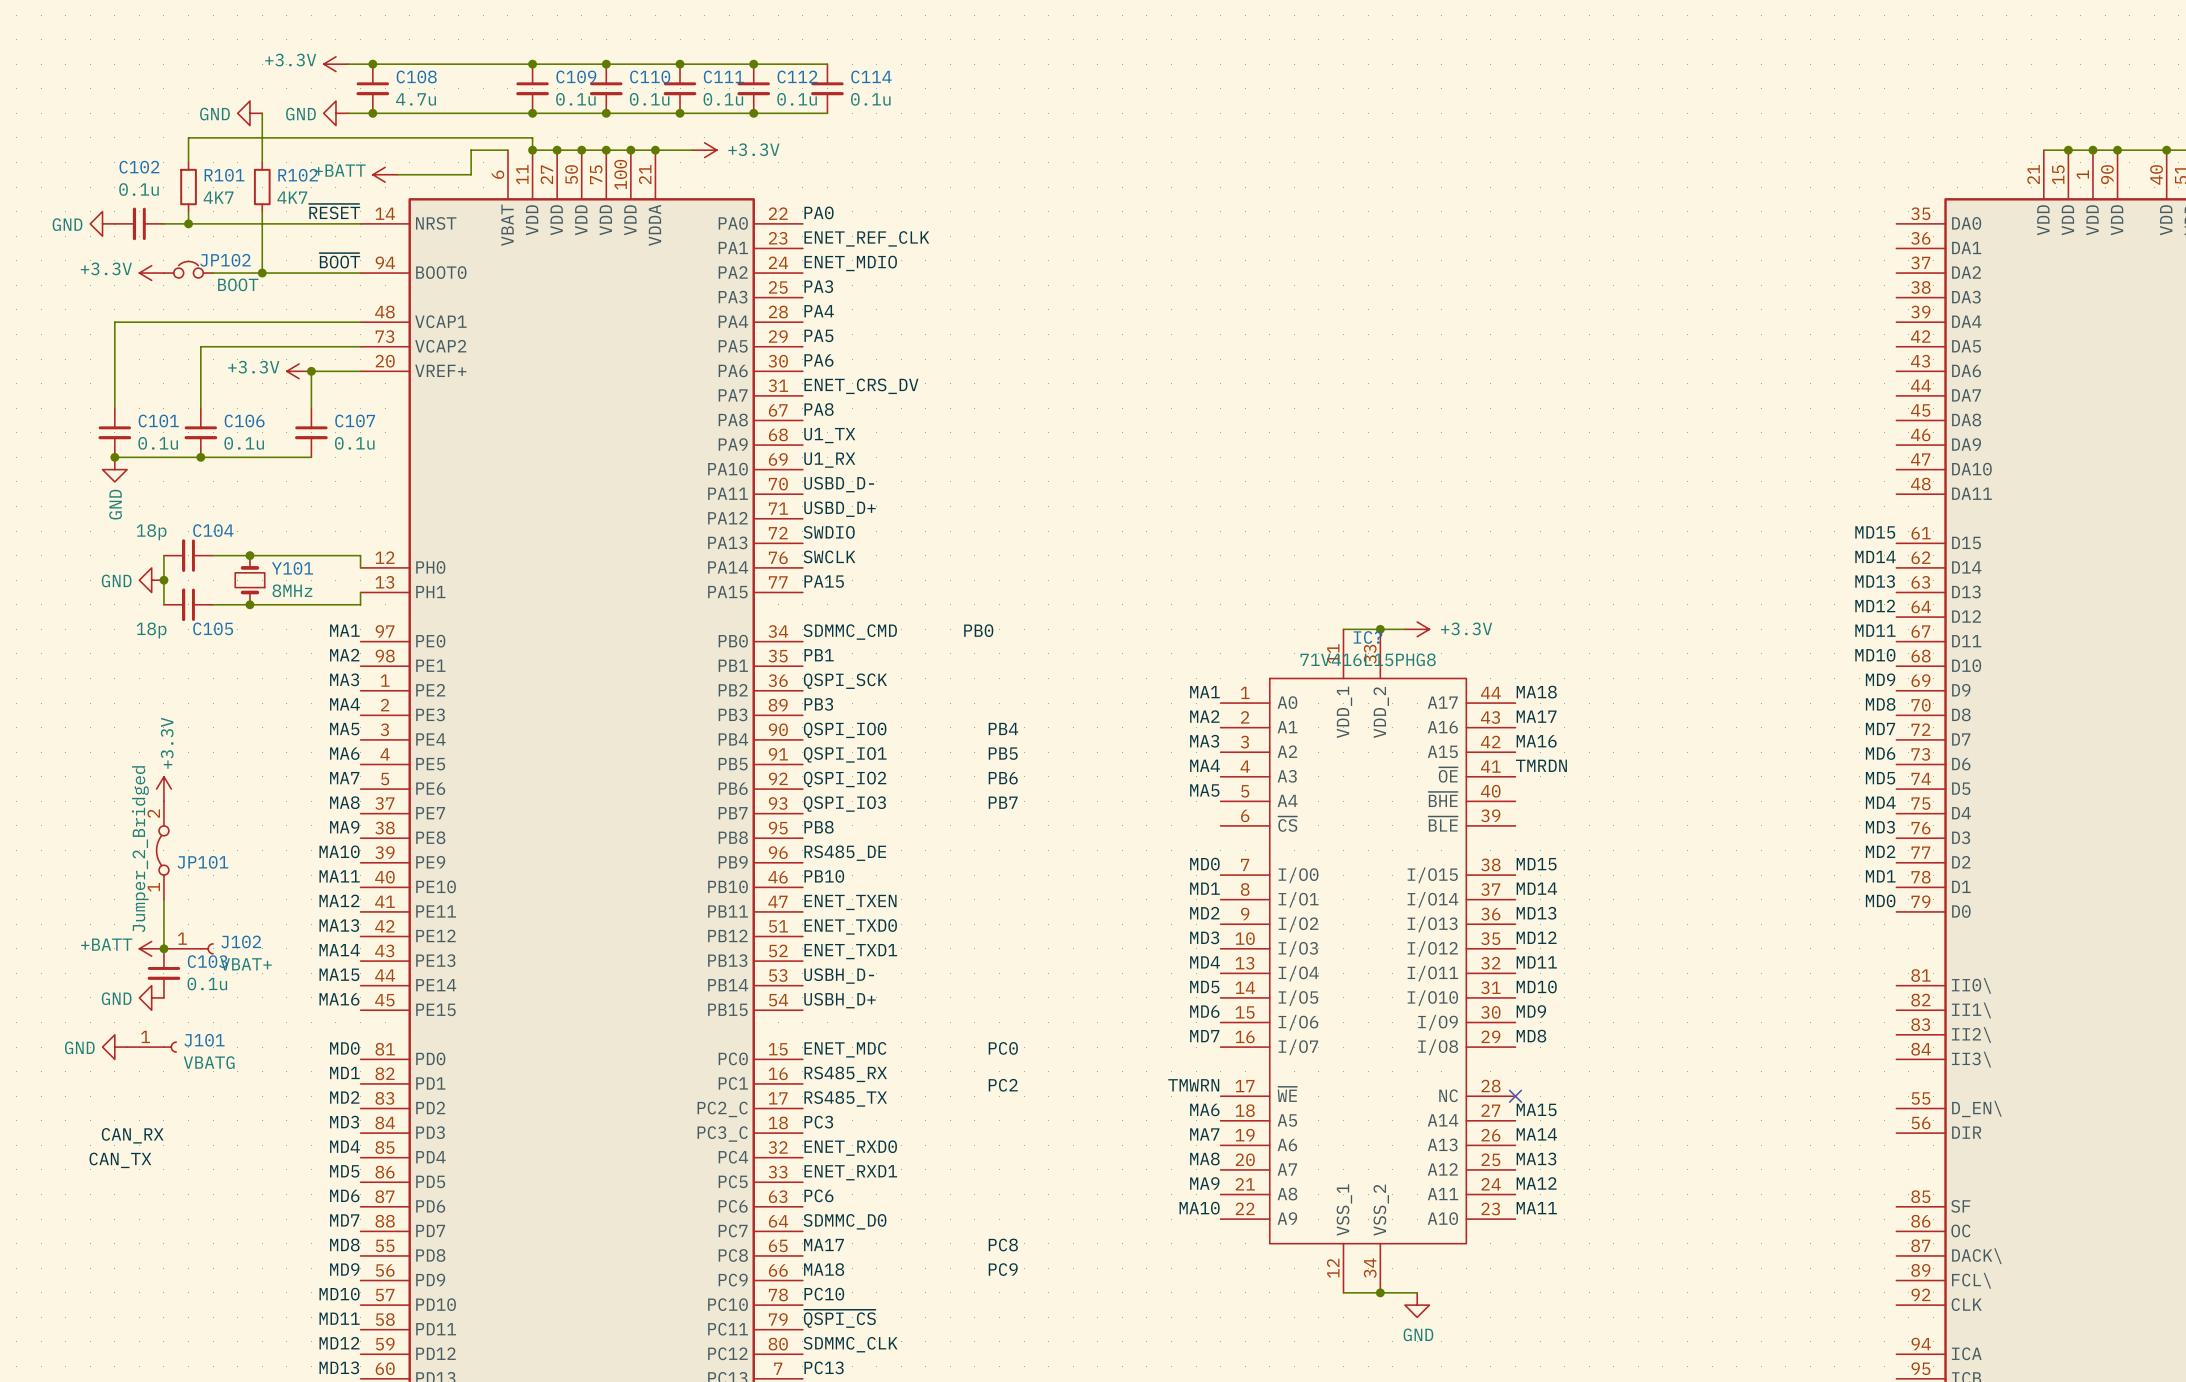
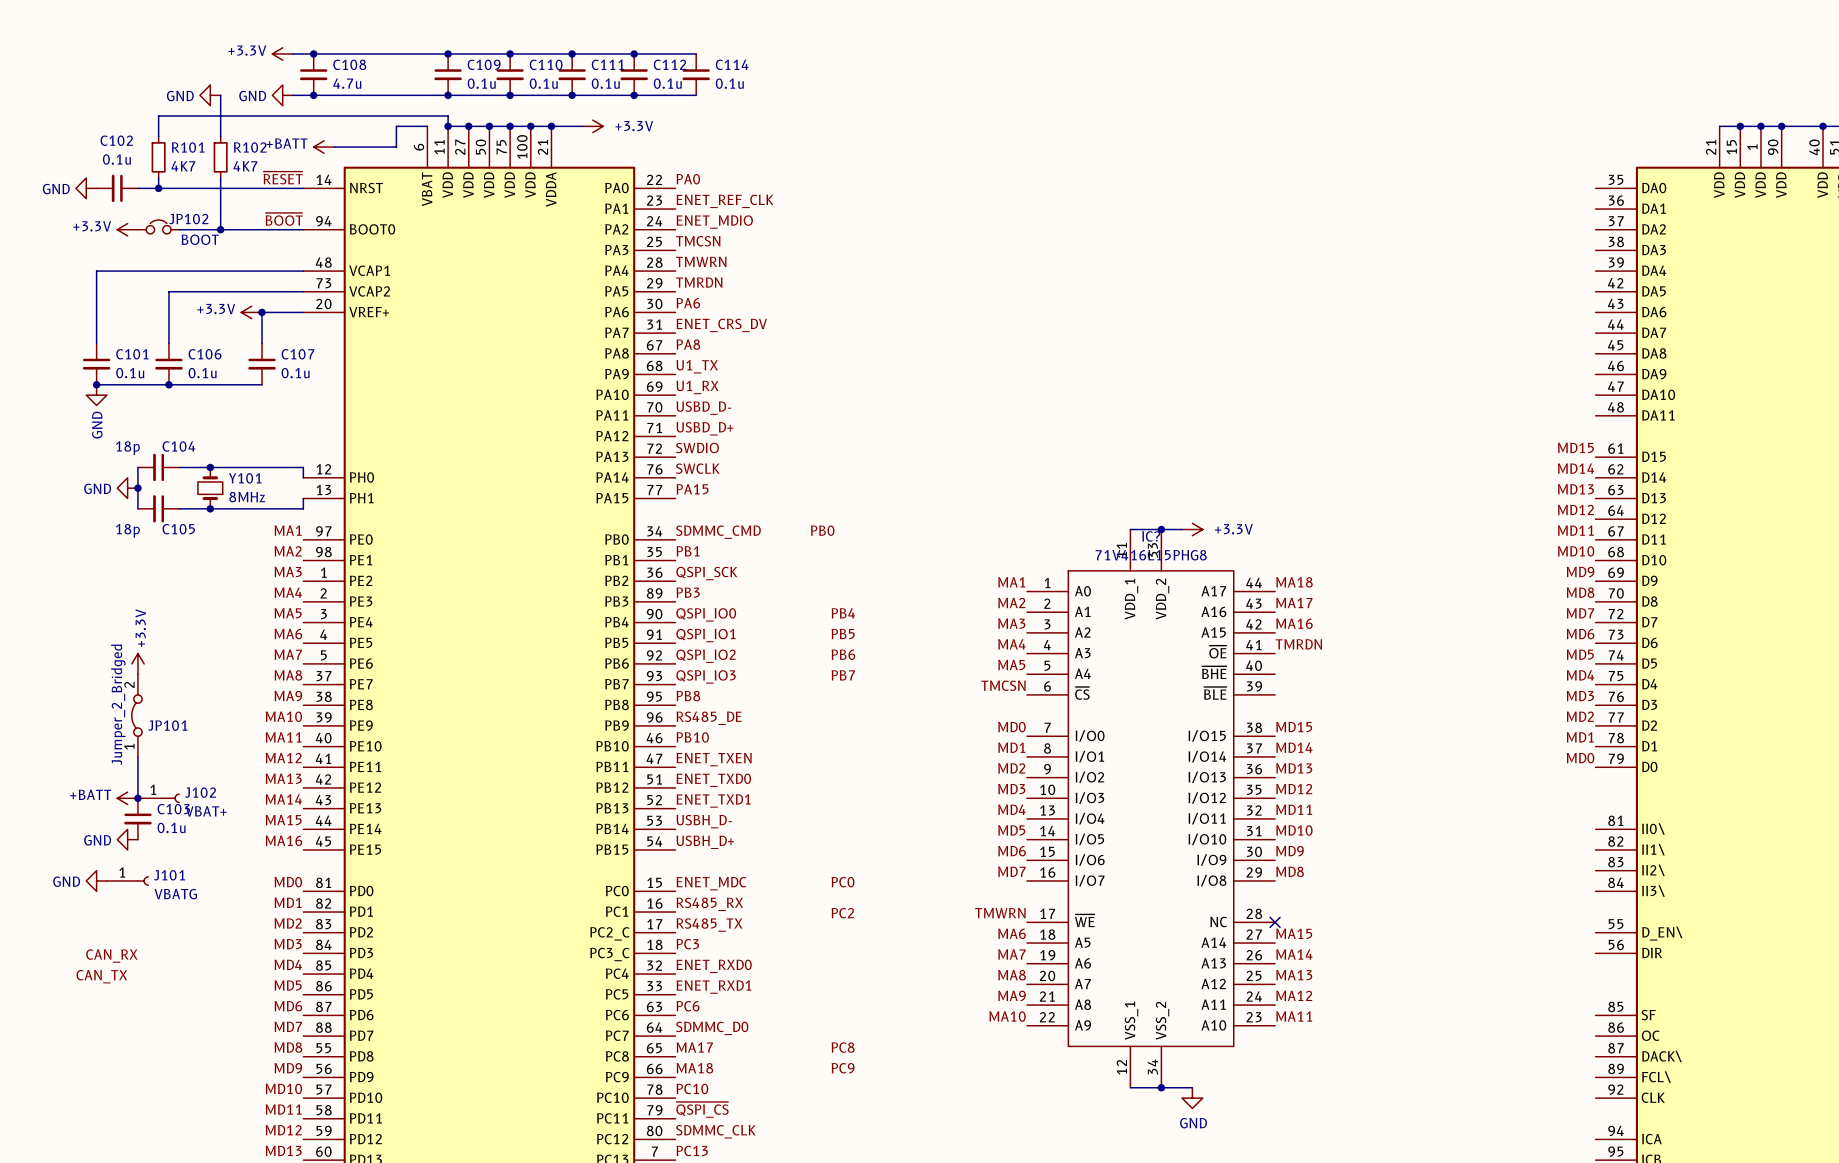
label: PA3 (818, 286) -> TMCSN (698, 241)
label: PA4 (819, 311) -> TMWRN (701, 261)
label: PA5 (818, 335) -> TMRDN (699, 282)
label: none -> TMCSN (1003, 685)

